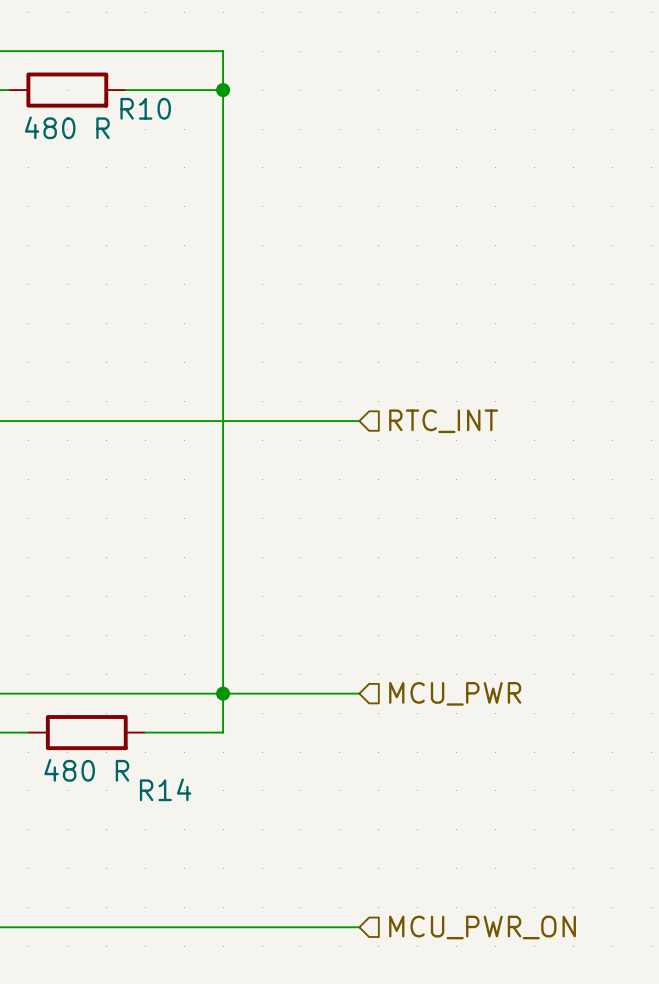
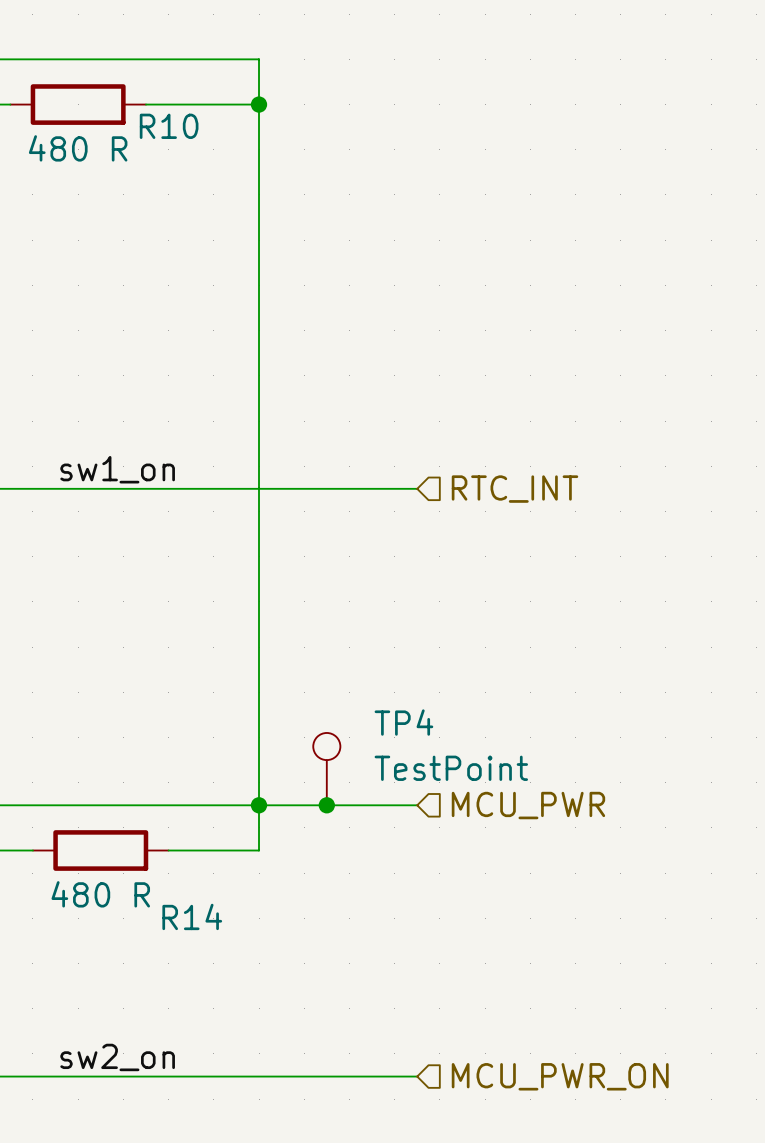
label: none -> sw1_on (117, 469)
TP4: none -> TestPoint (326, 769)
junction: none -> (326, 805)
label: none -> sw2_on (117, 1057)

